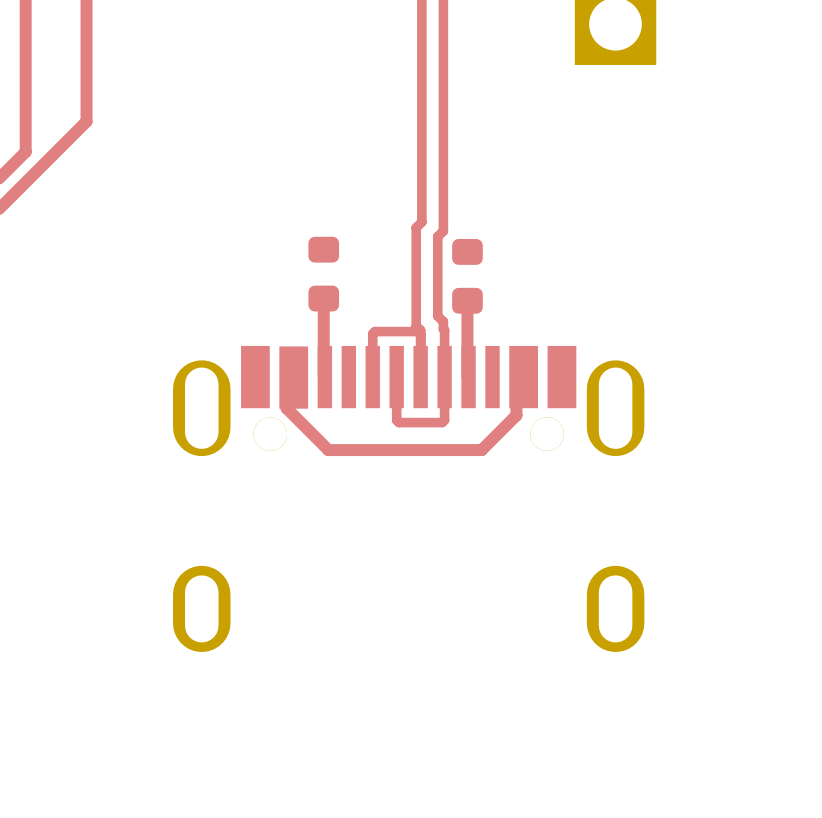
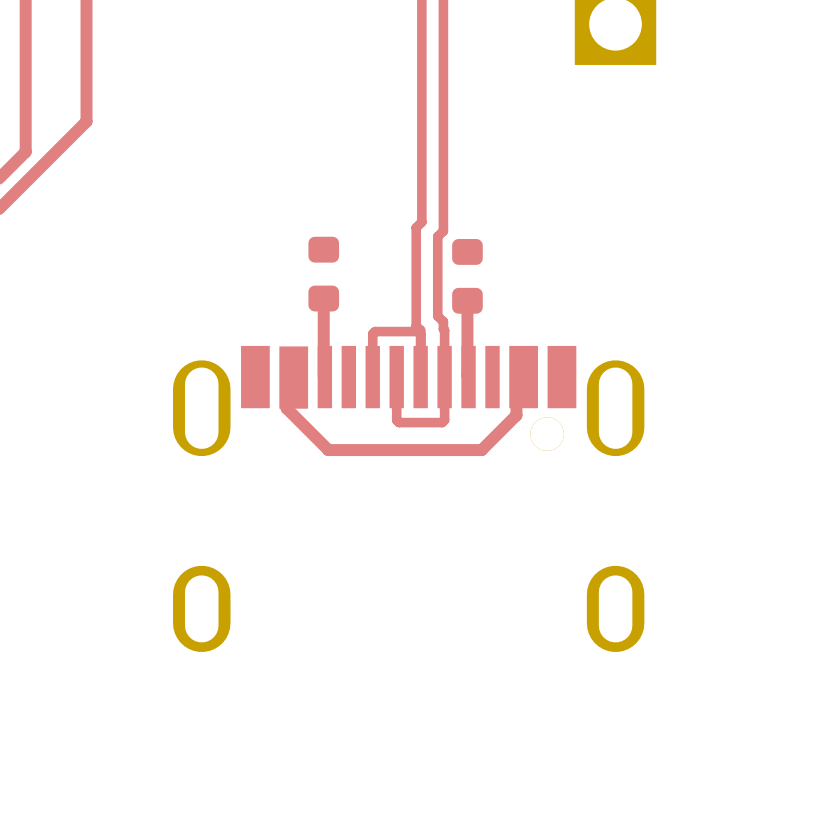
part footprint: [173, 345, 645, 653] -> [173, 345, 645, 653]

